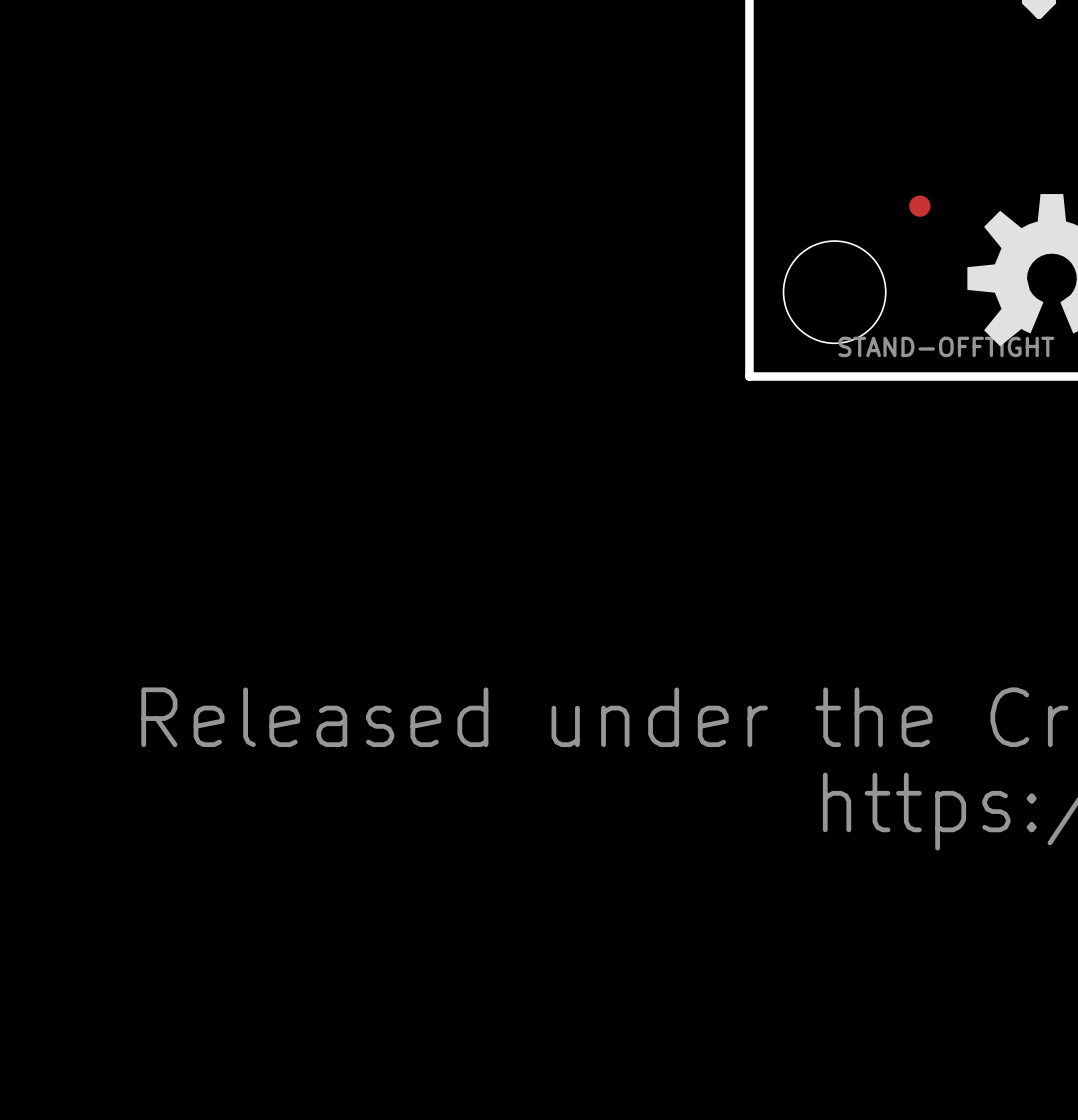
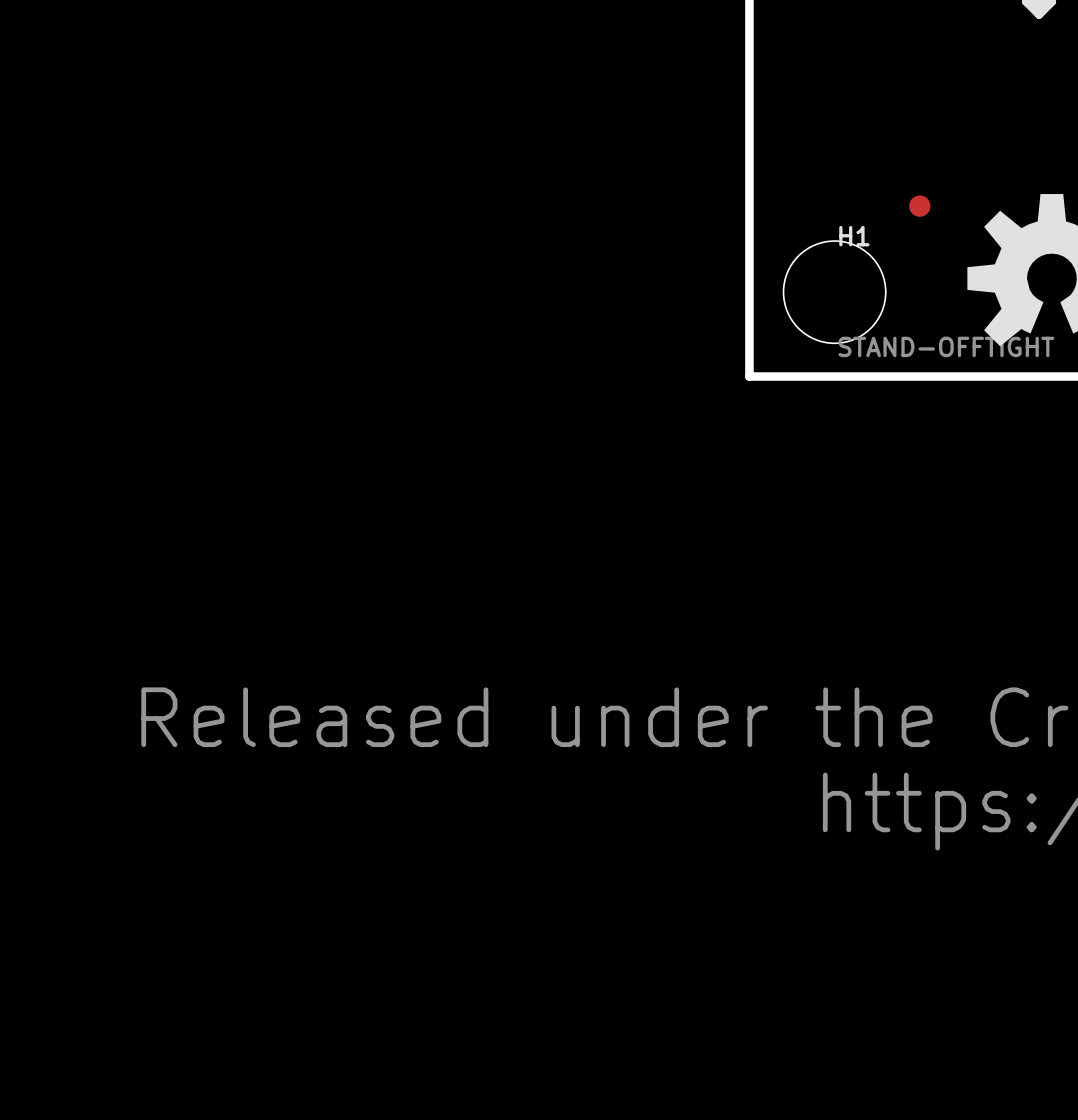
H1 name: none -> H1 (854, 236)

